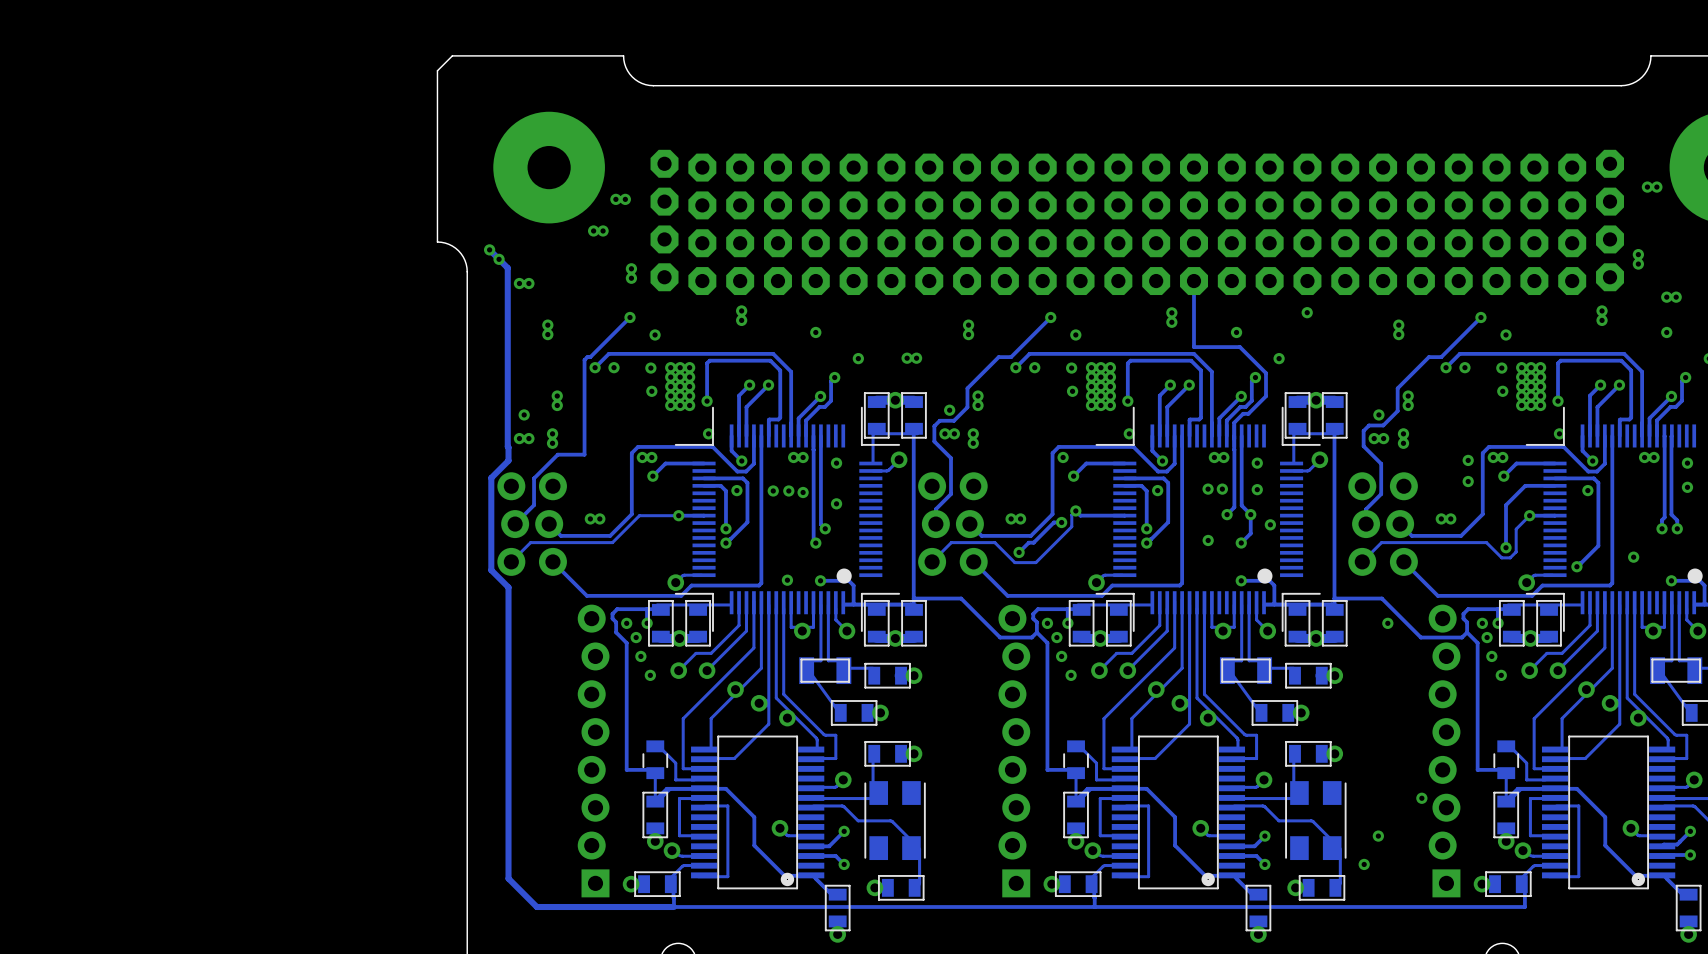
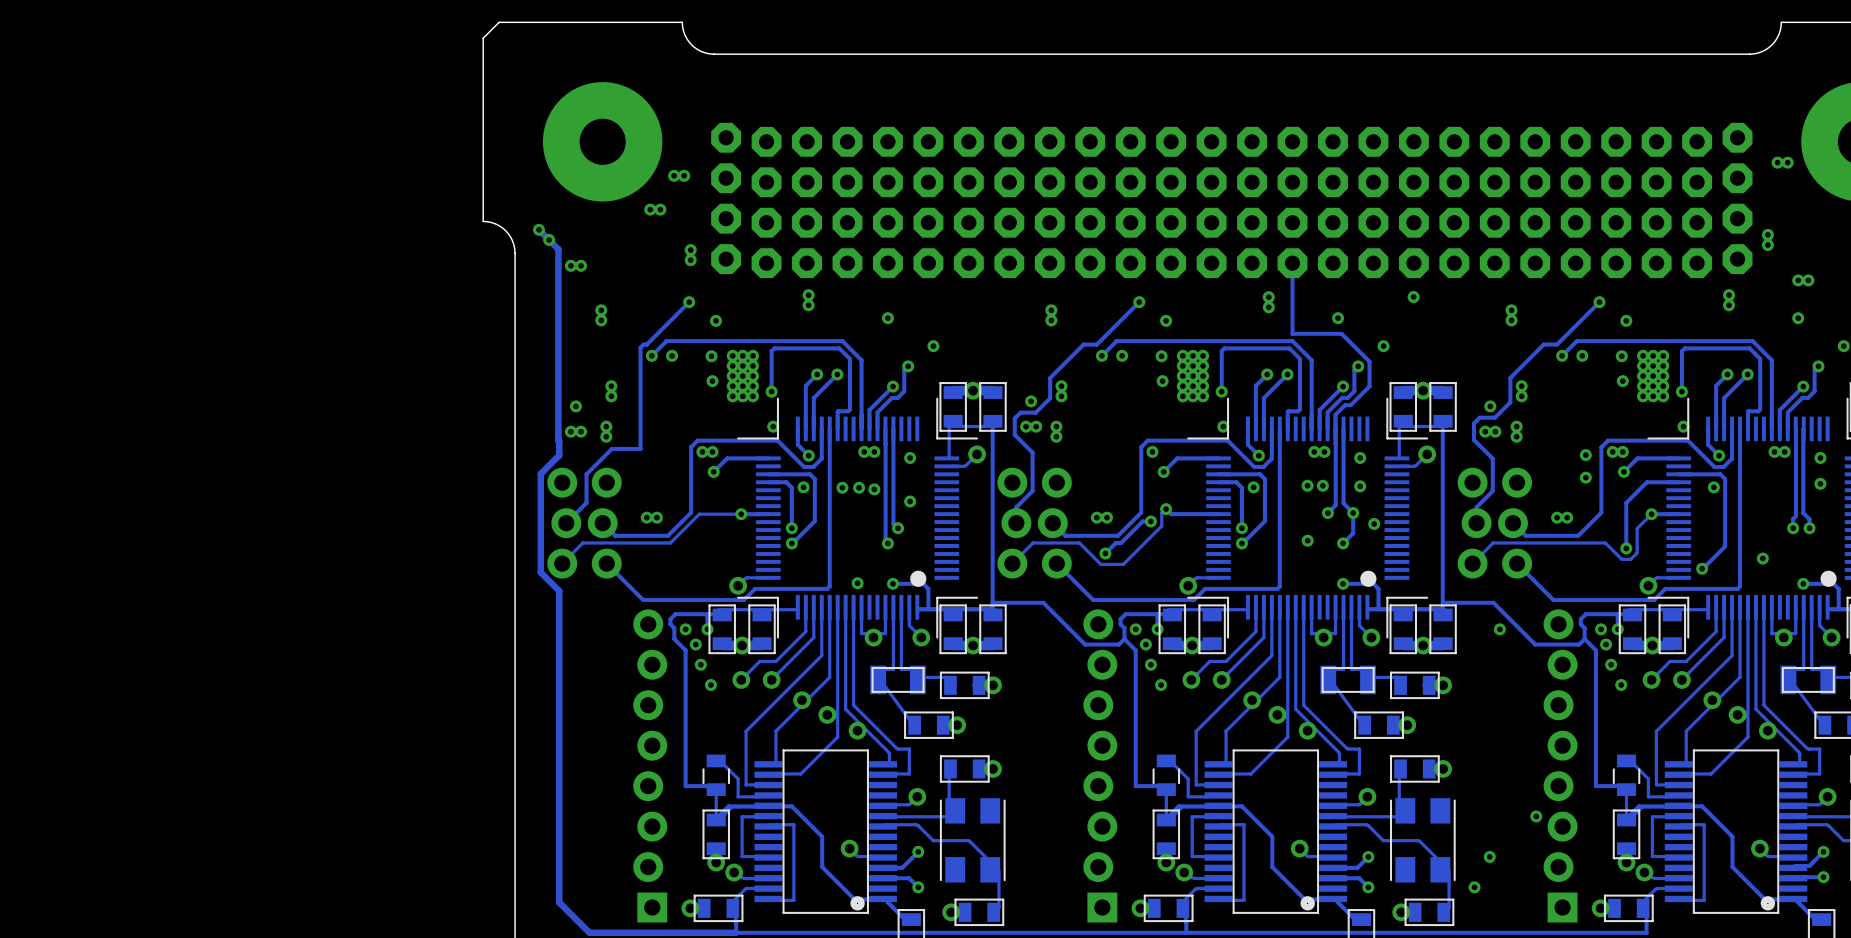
via: (907, 358) -> none
via: (916, 358) -> none

